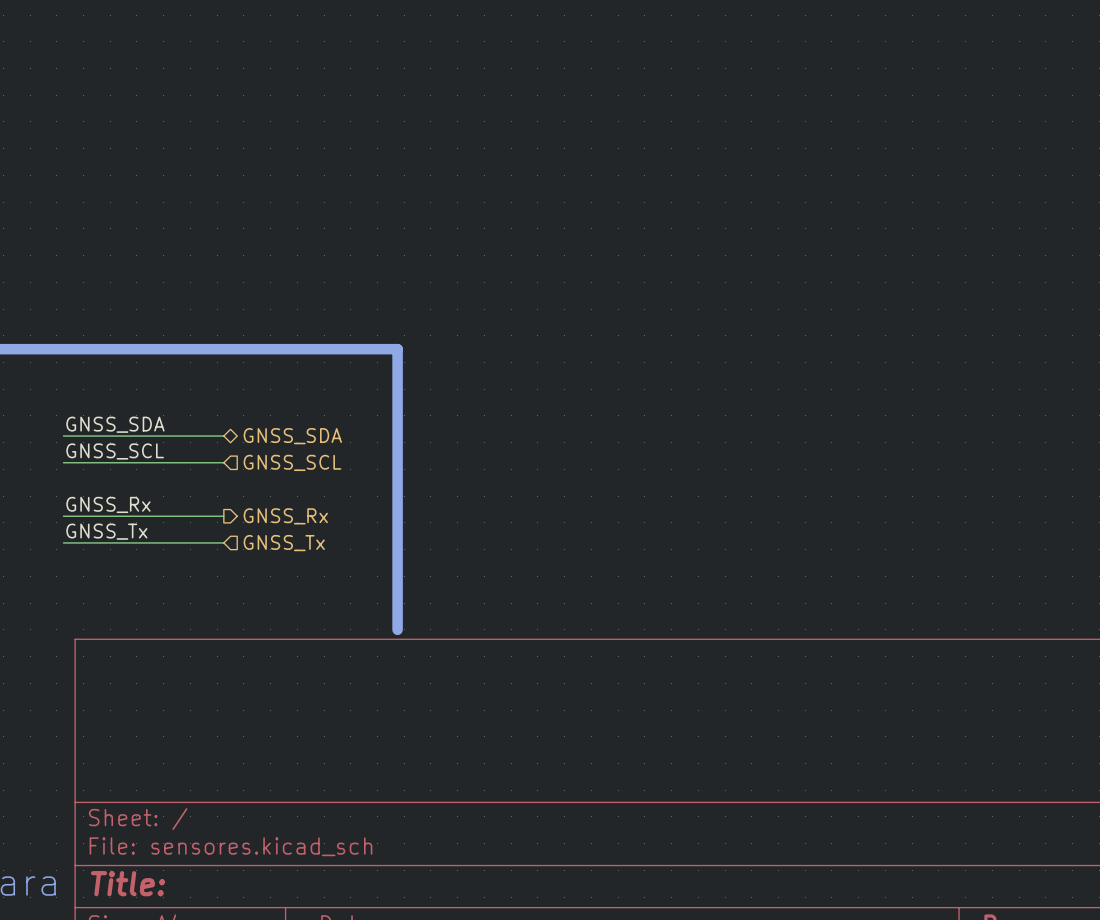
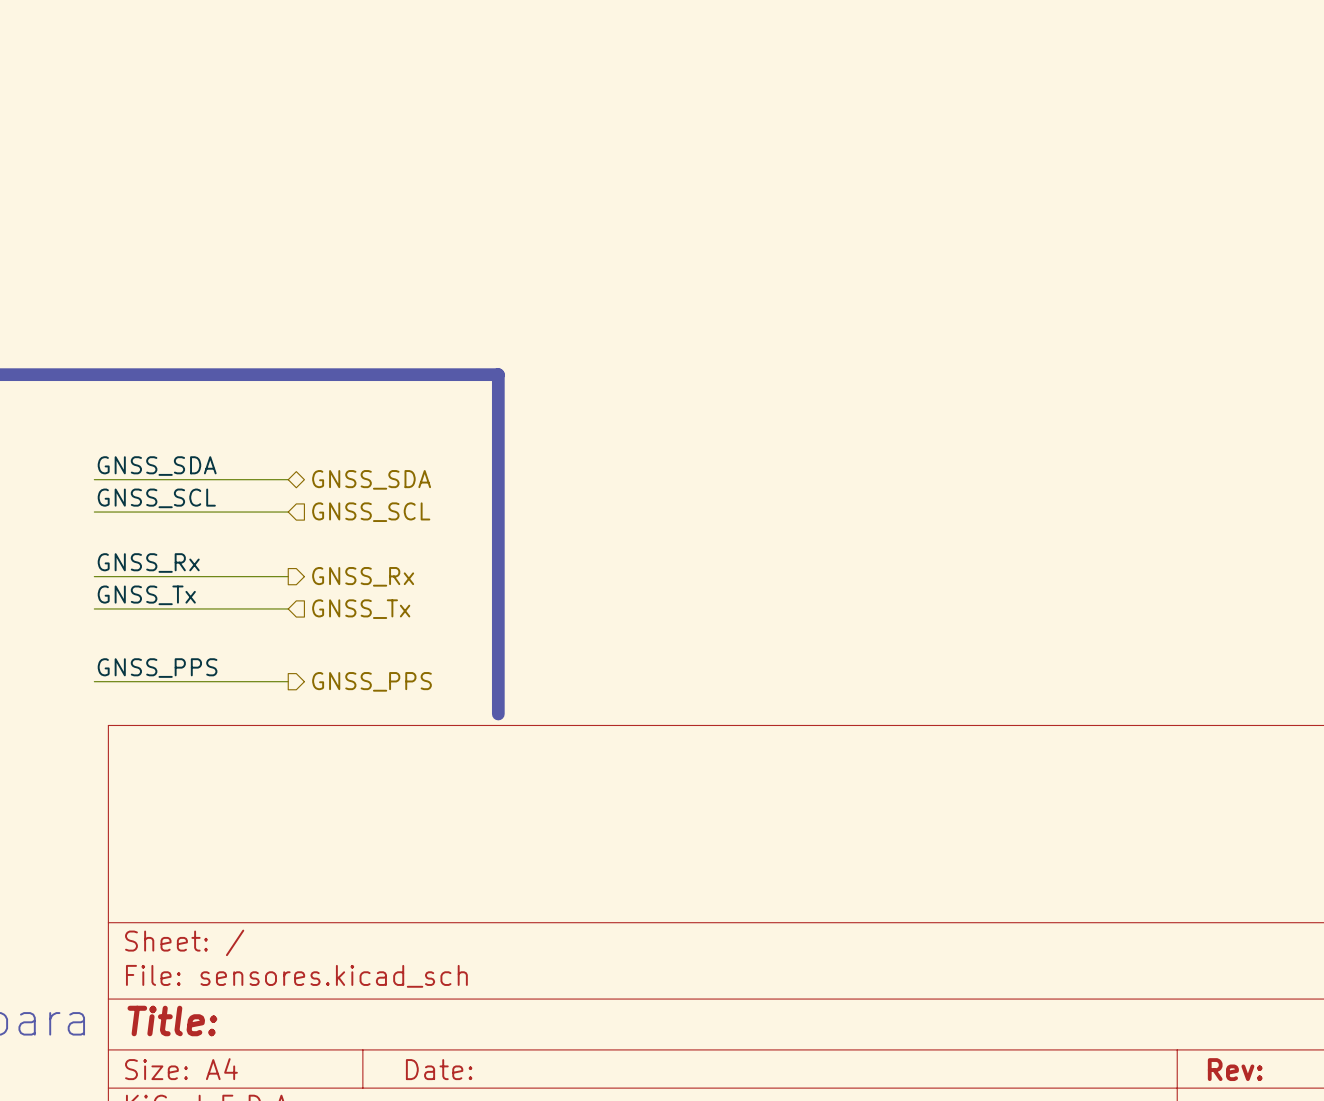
label: none -> GNSS_PPS (157, 668)
wire: none -> (94, 681) (288, 681)
hierarchical label: none -> GNSS_PPS (371, 681)

